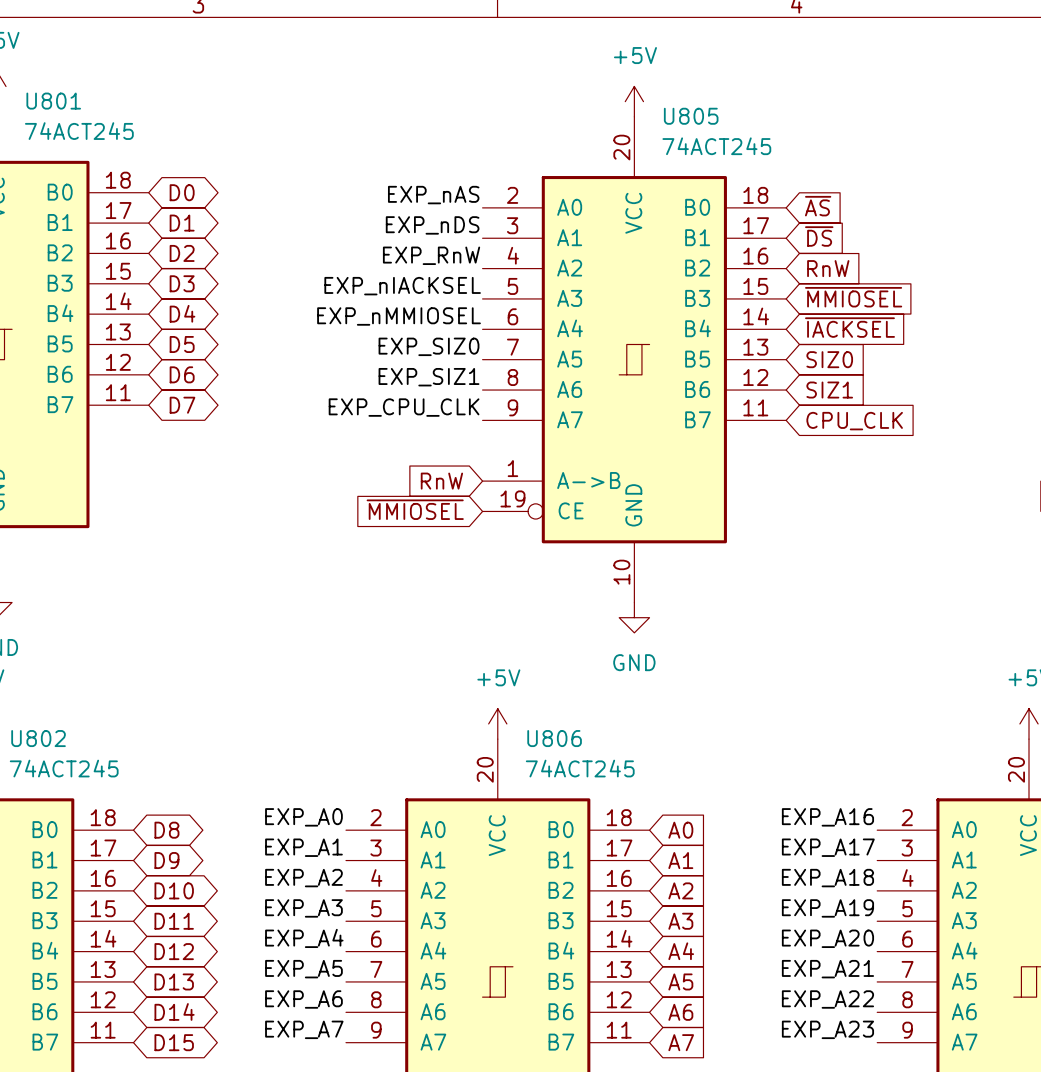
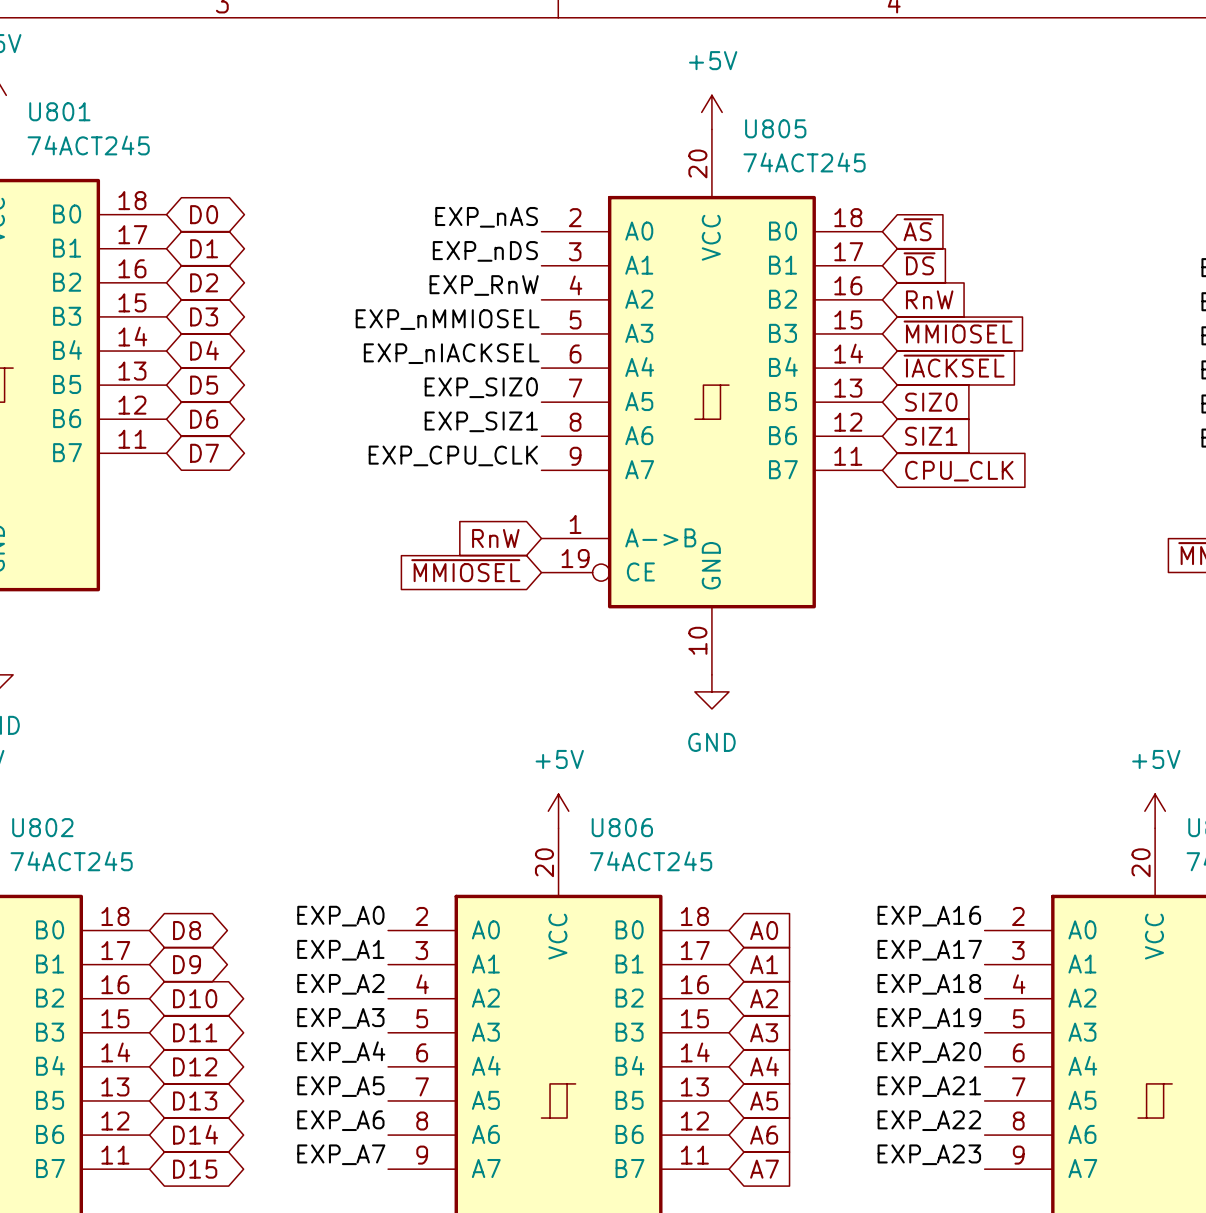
label: EXP_nIACKSEL (402, 286) -> EXP_nMMIOSEL (447, 319)
label: EXP_nMMIOSEL (399, 316) -> EXP_nIACKSEL (451, 353)

